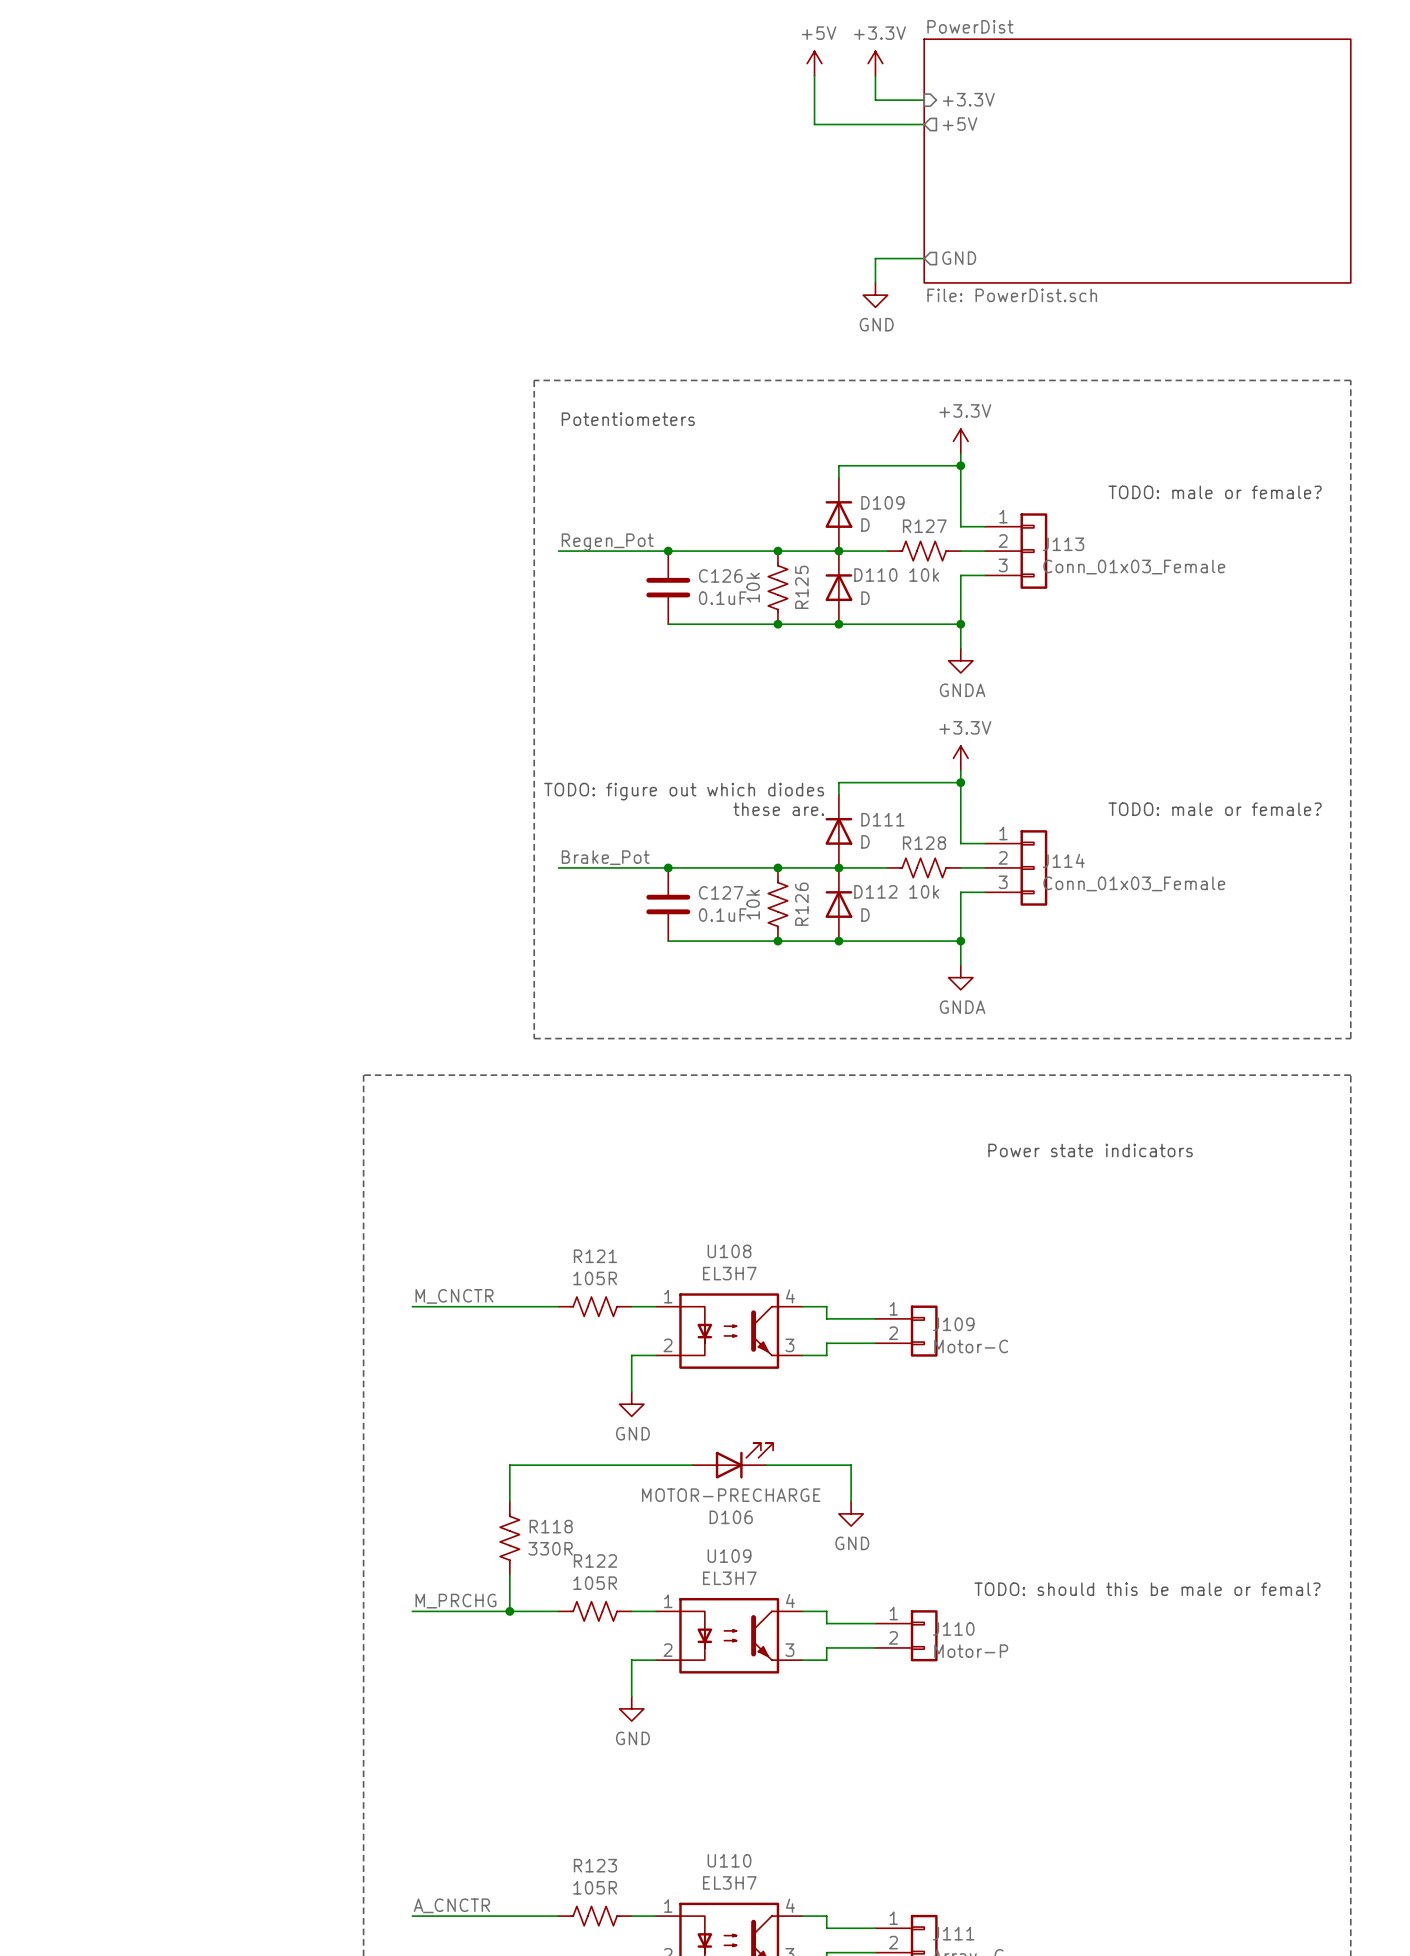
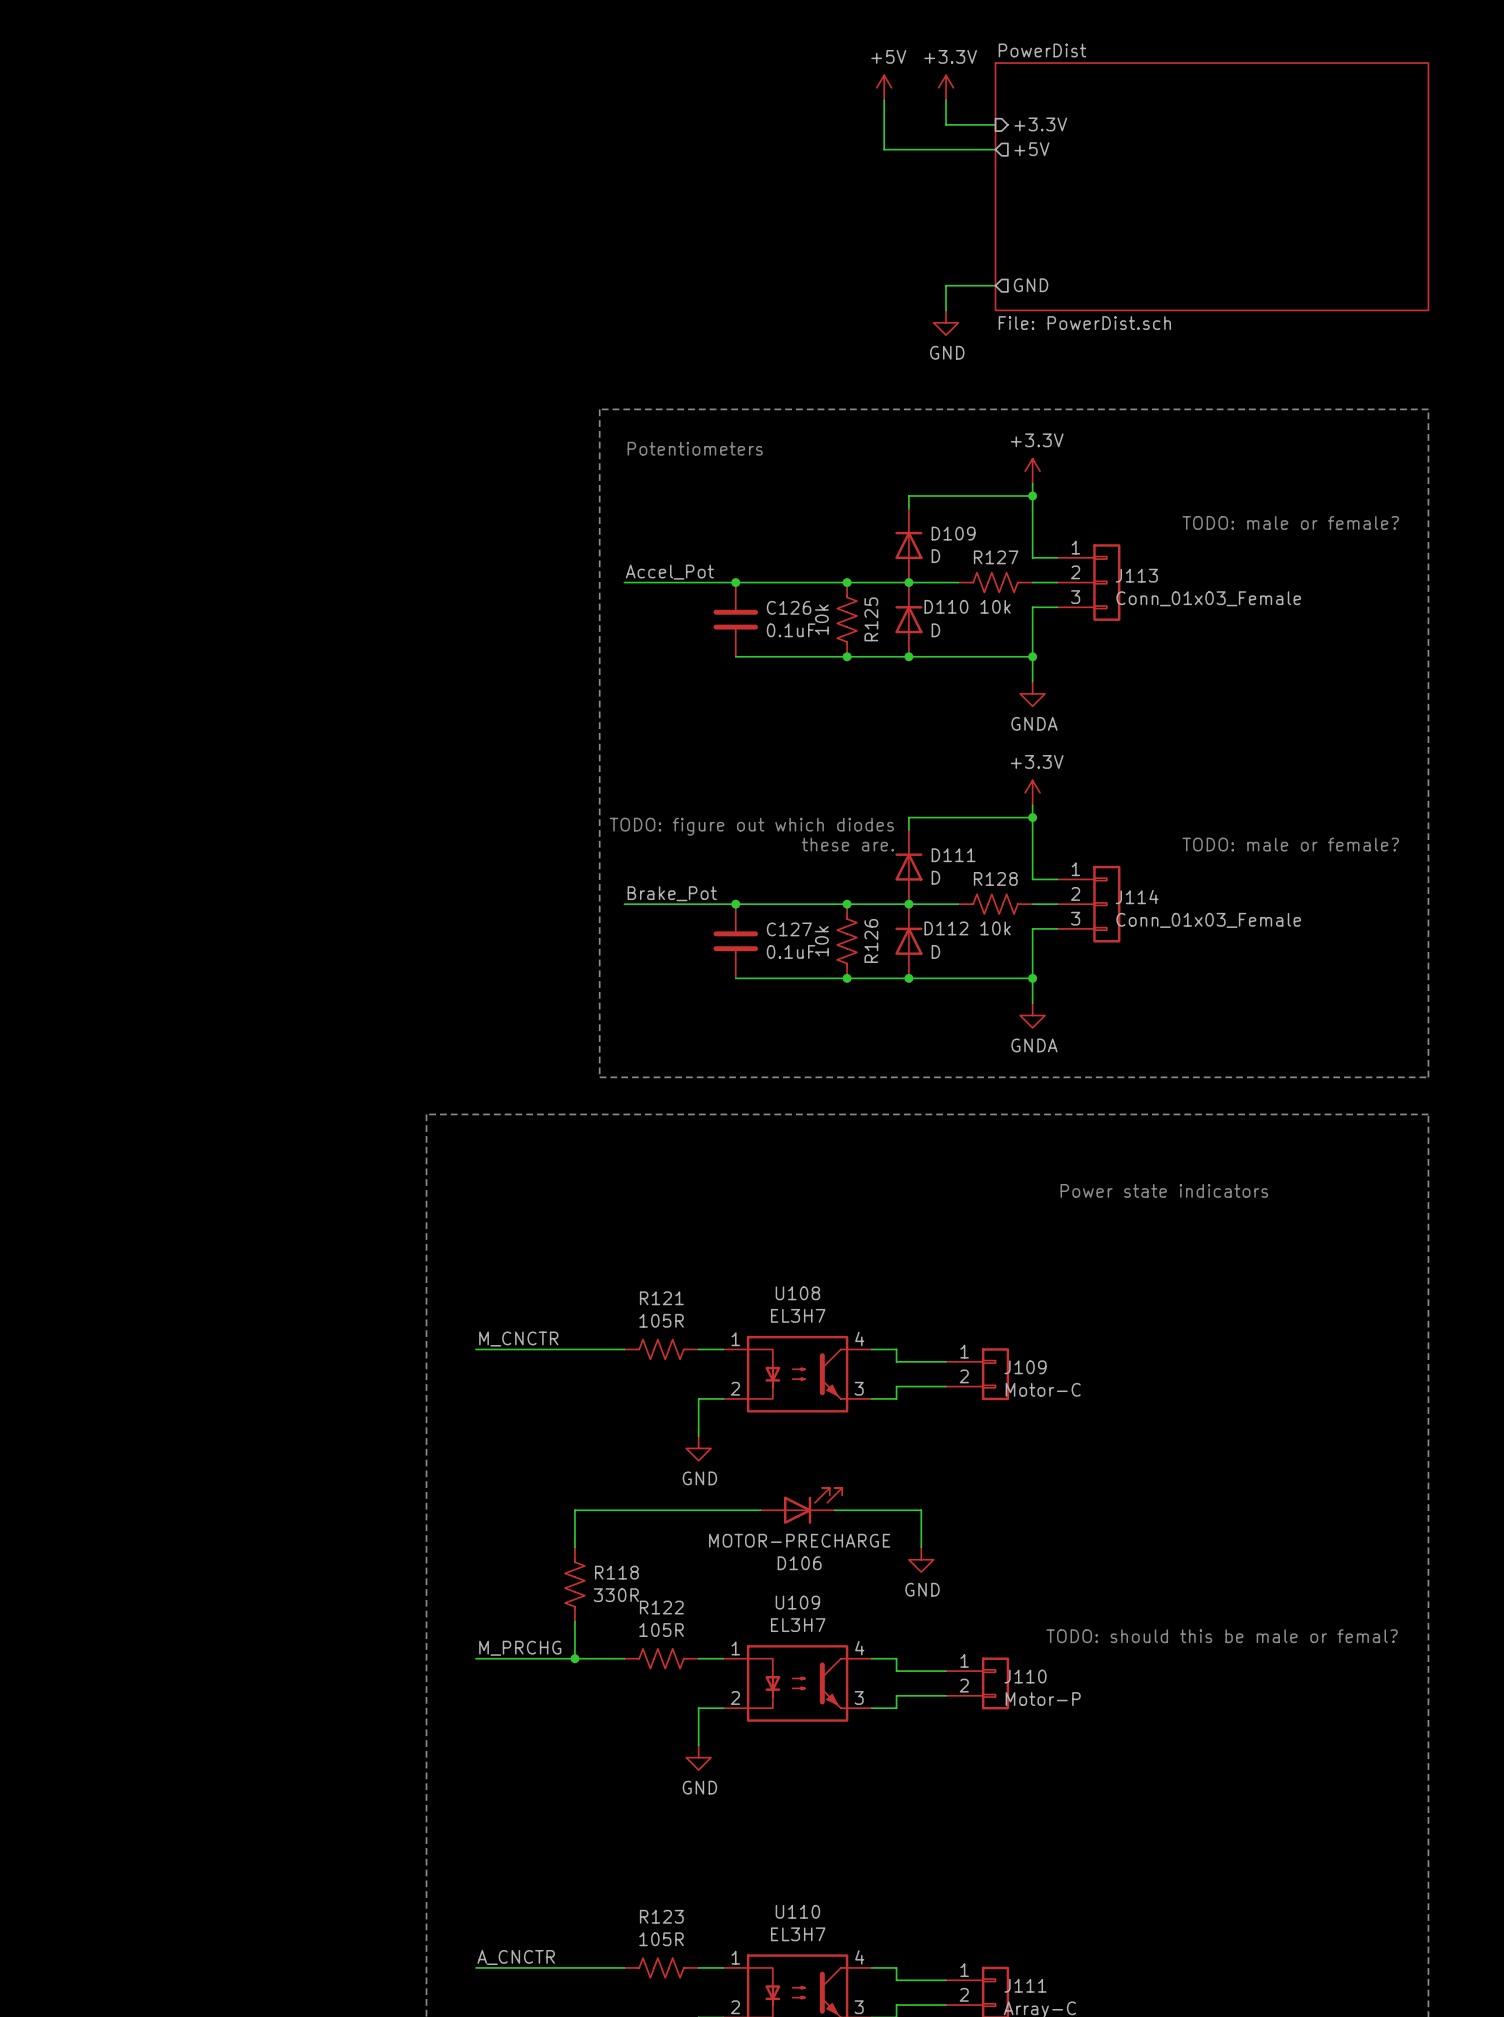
label: Regen_Pot (607, 542) -> Accel_Pot (669, 572)

